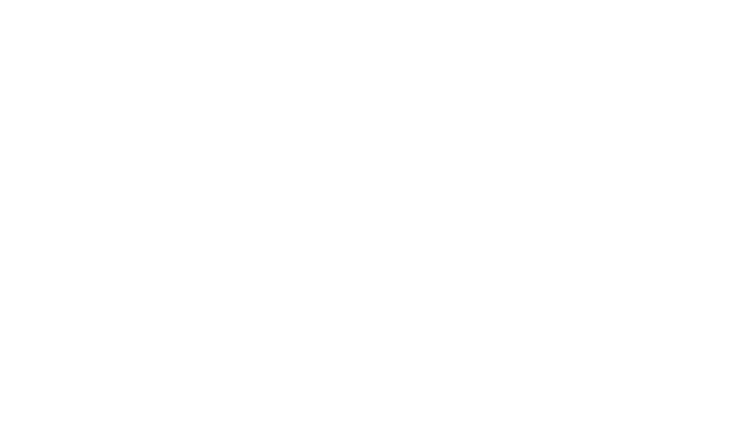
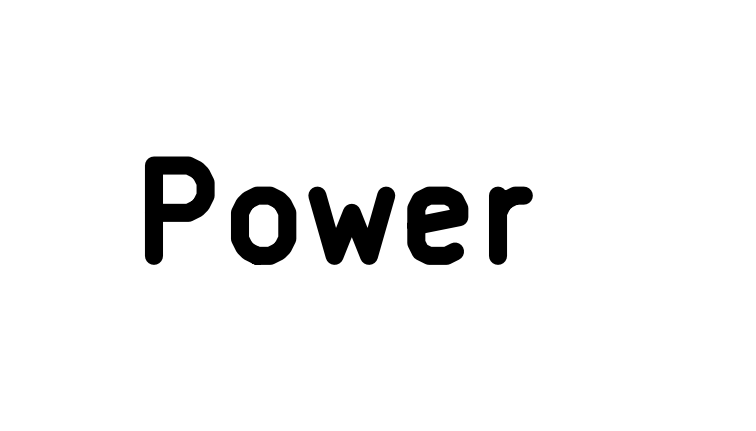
text: none -> Power (338, 210)

